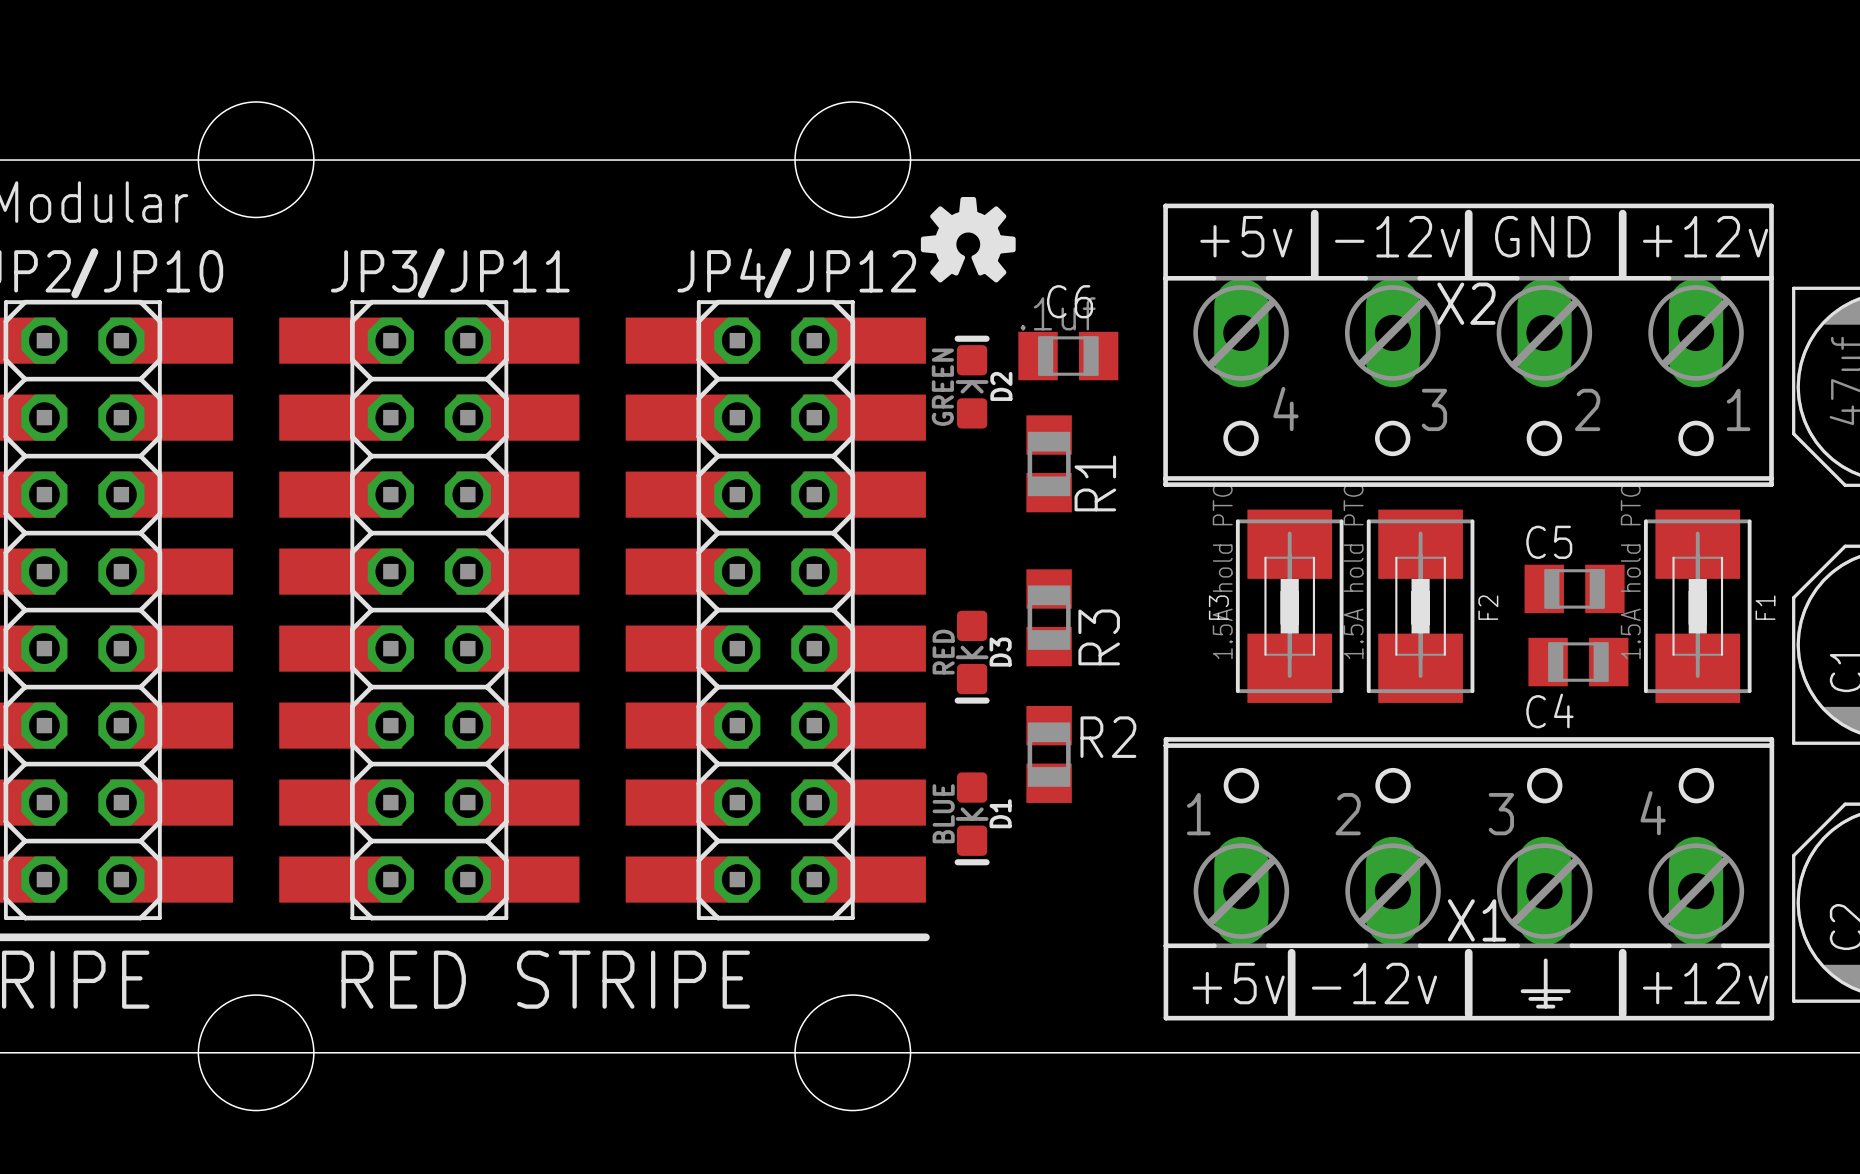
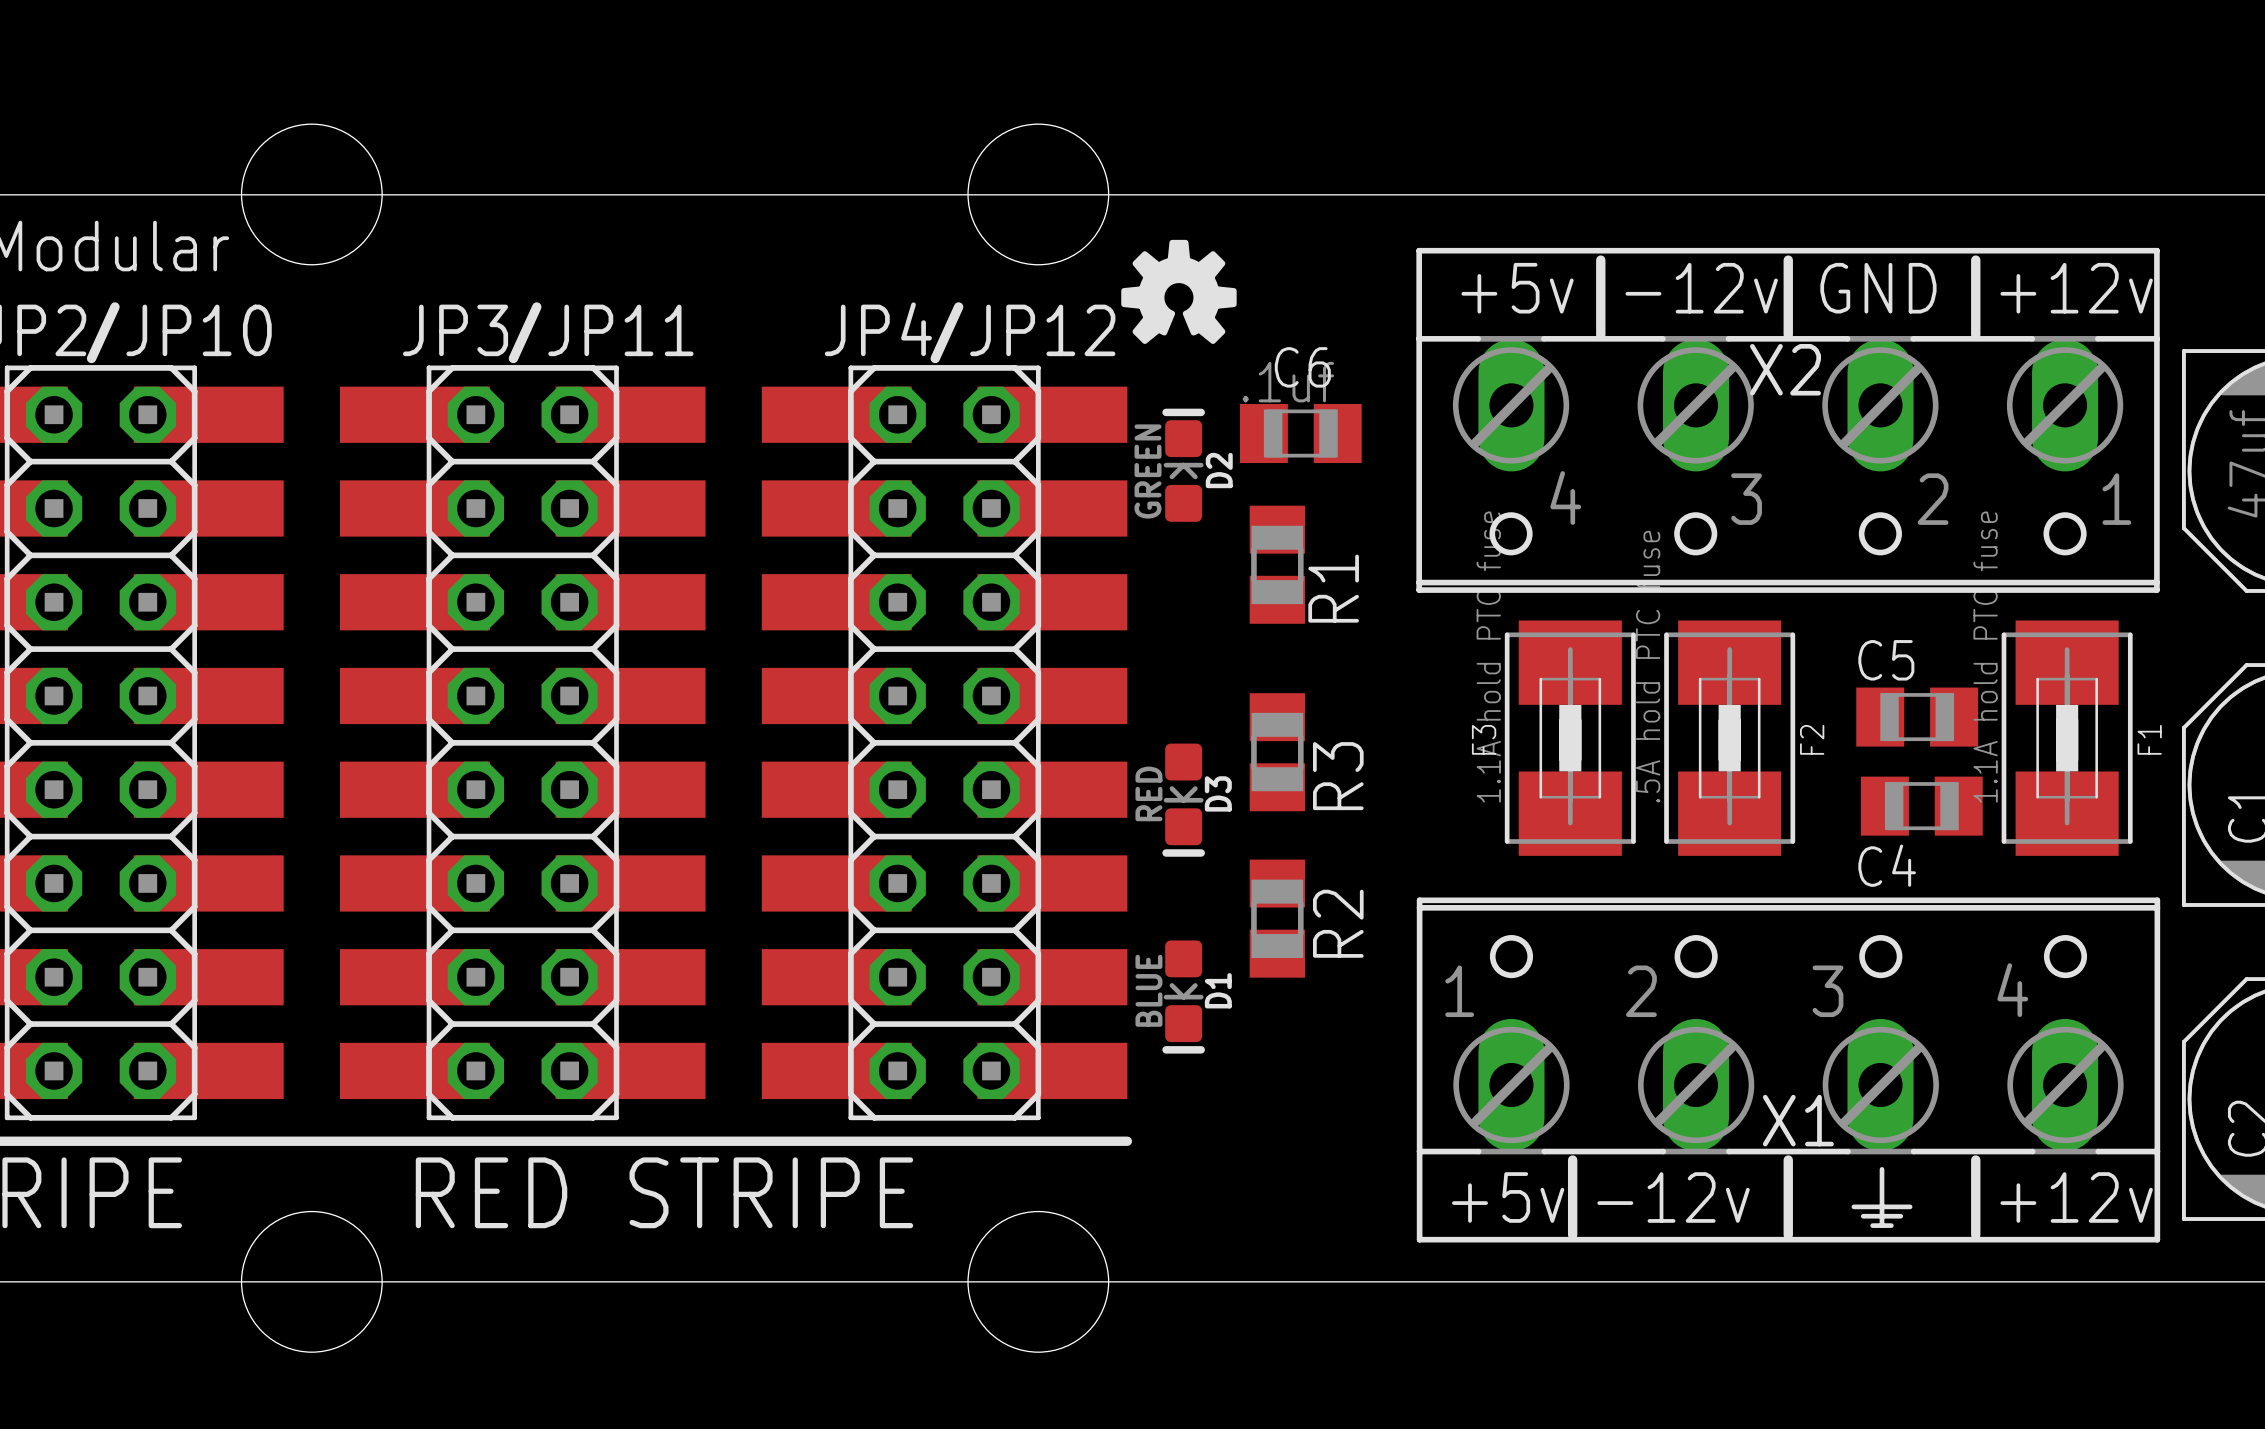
F3 value: 1.5A hold PTC (1222, 572) -> 1.1A hold PTC fuse (1488, 657)
F2 value: 1.5A hold PTC (1353, 572) -> .5A hold PTC fuse (1648, 666)
F1 value: 1.5A hold PTC (1630, 572) -> 1.1A hold PTC fuse (1985, 657)
R2 name rotation: 0° (1108, 737) -> 90° counterclockwise (1338, 923)

